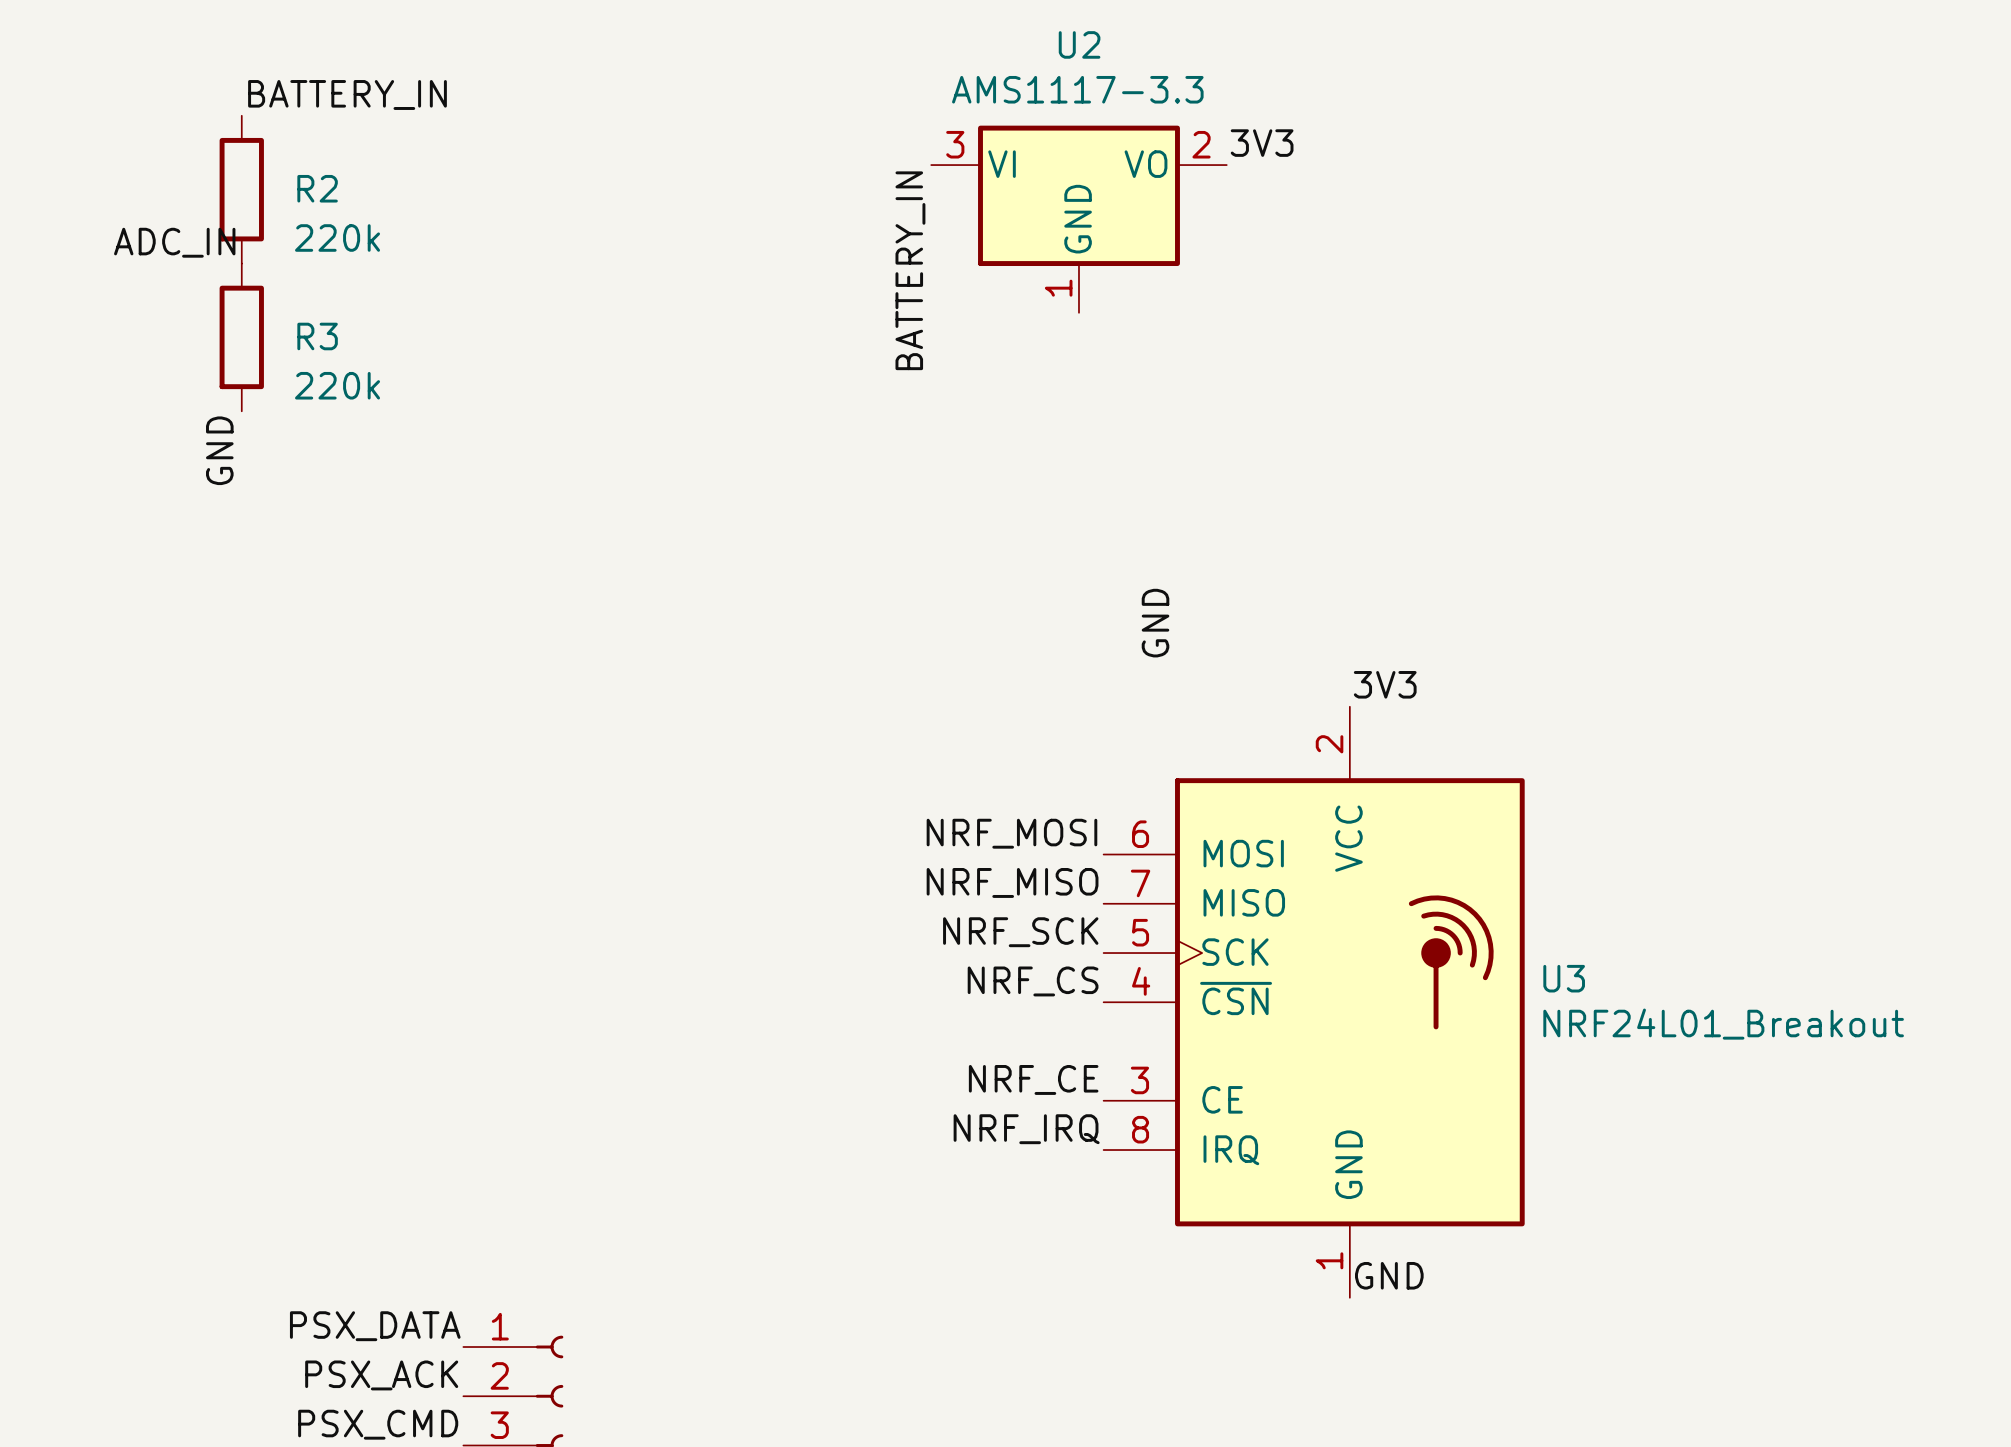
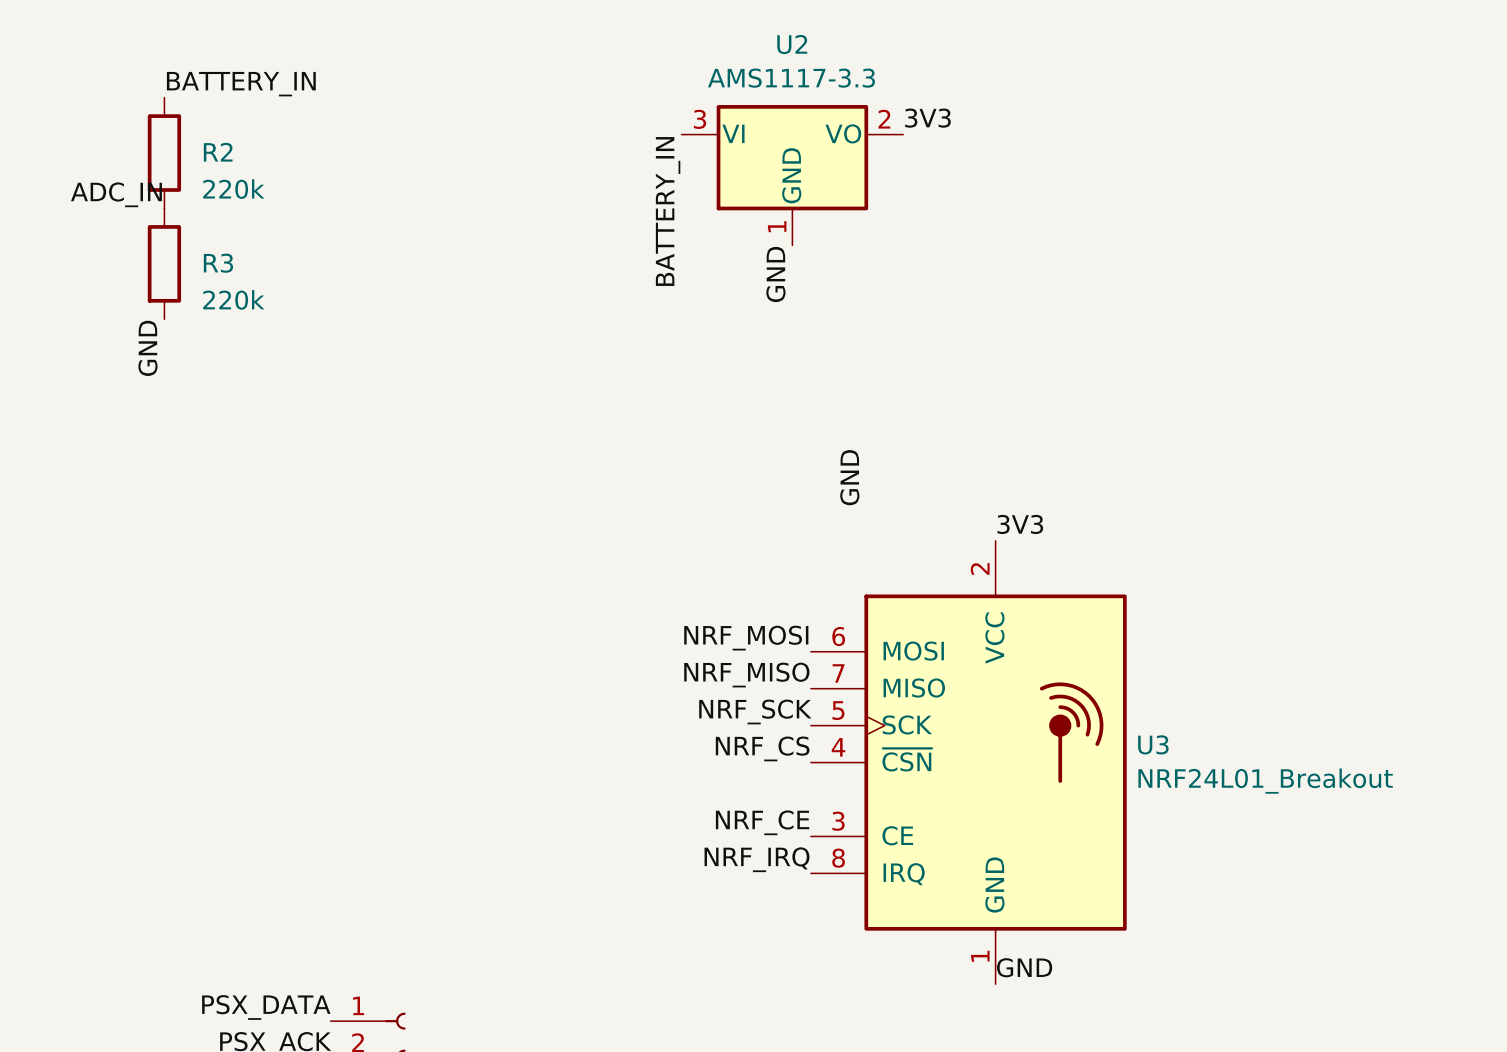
label: none -> GND (775, 274)

